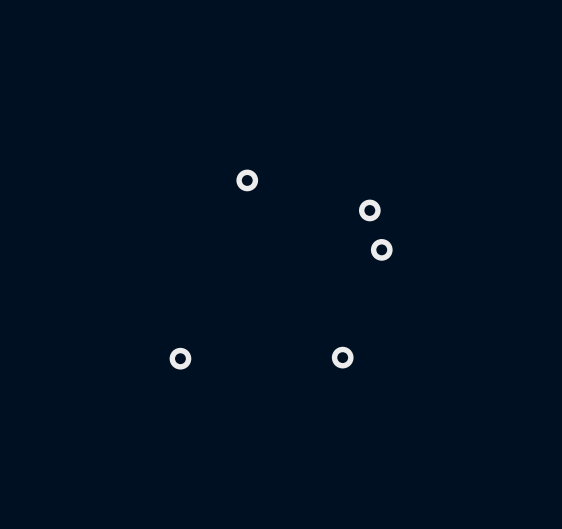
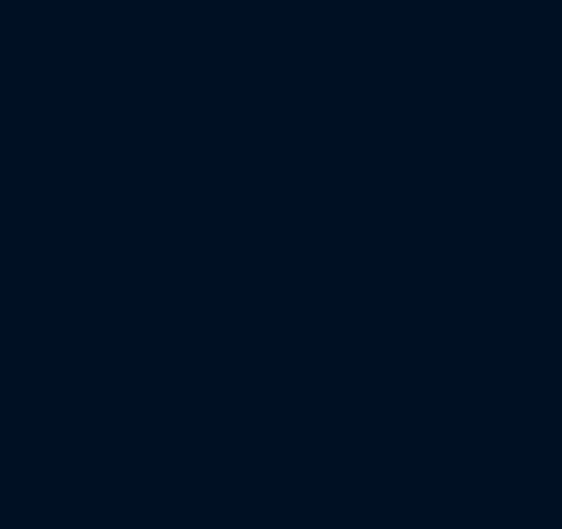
via: (247, 180) -> none
via: (369, 210) -> none
via: (381, 249) -> none
via: (342, 357) -> none
via: (180, 358) -> none

